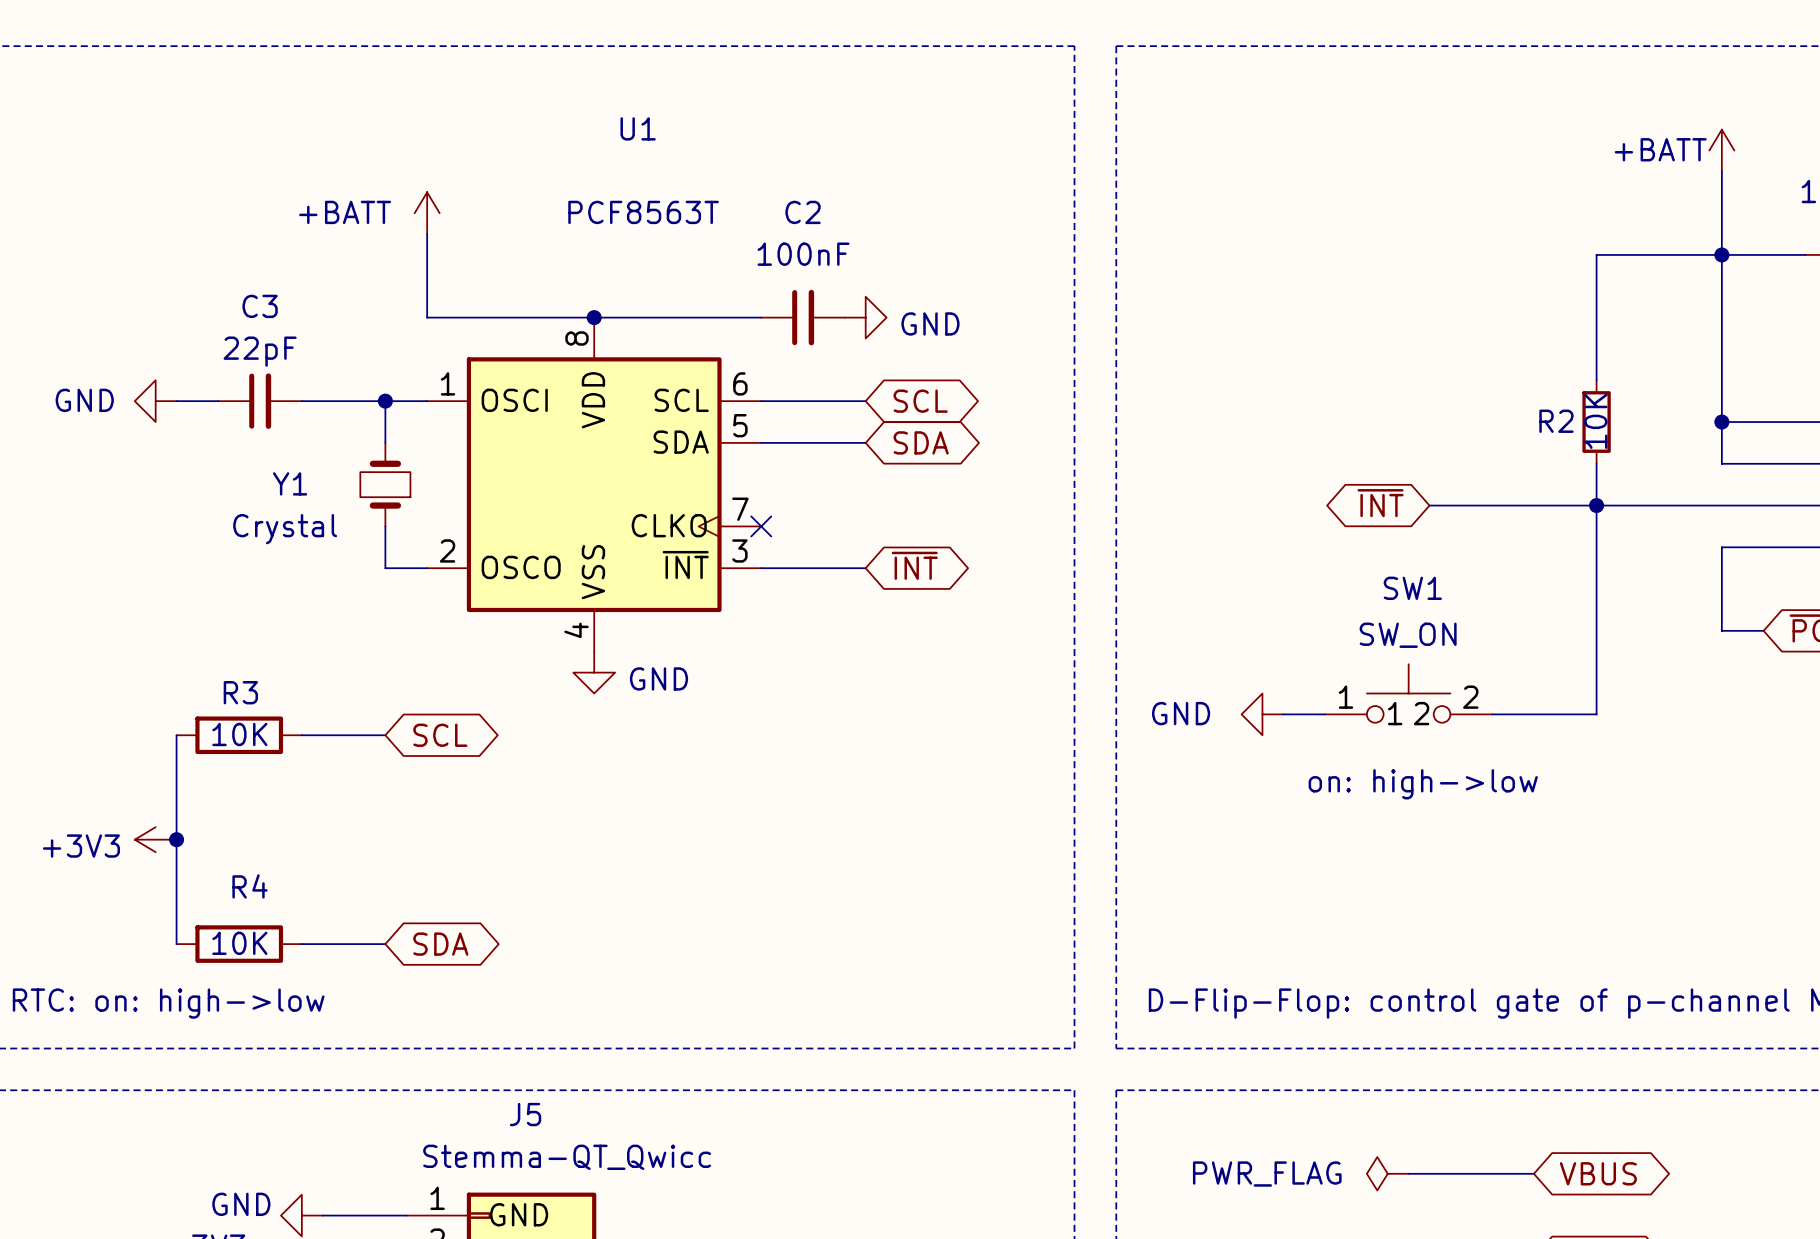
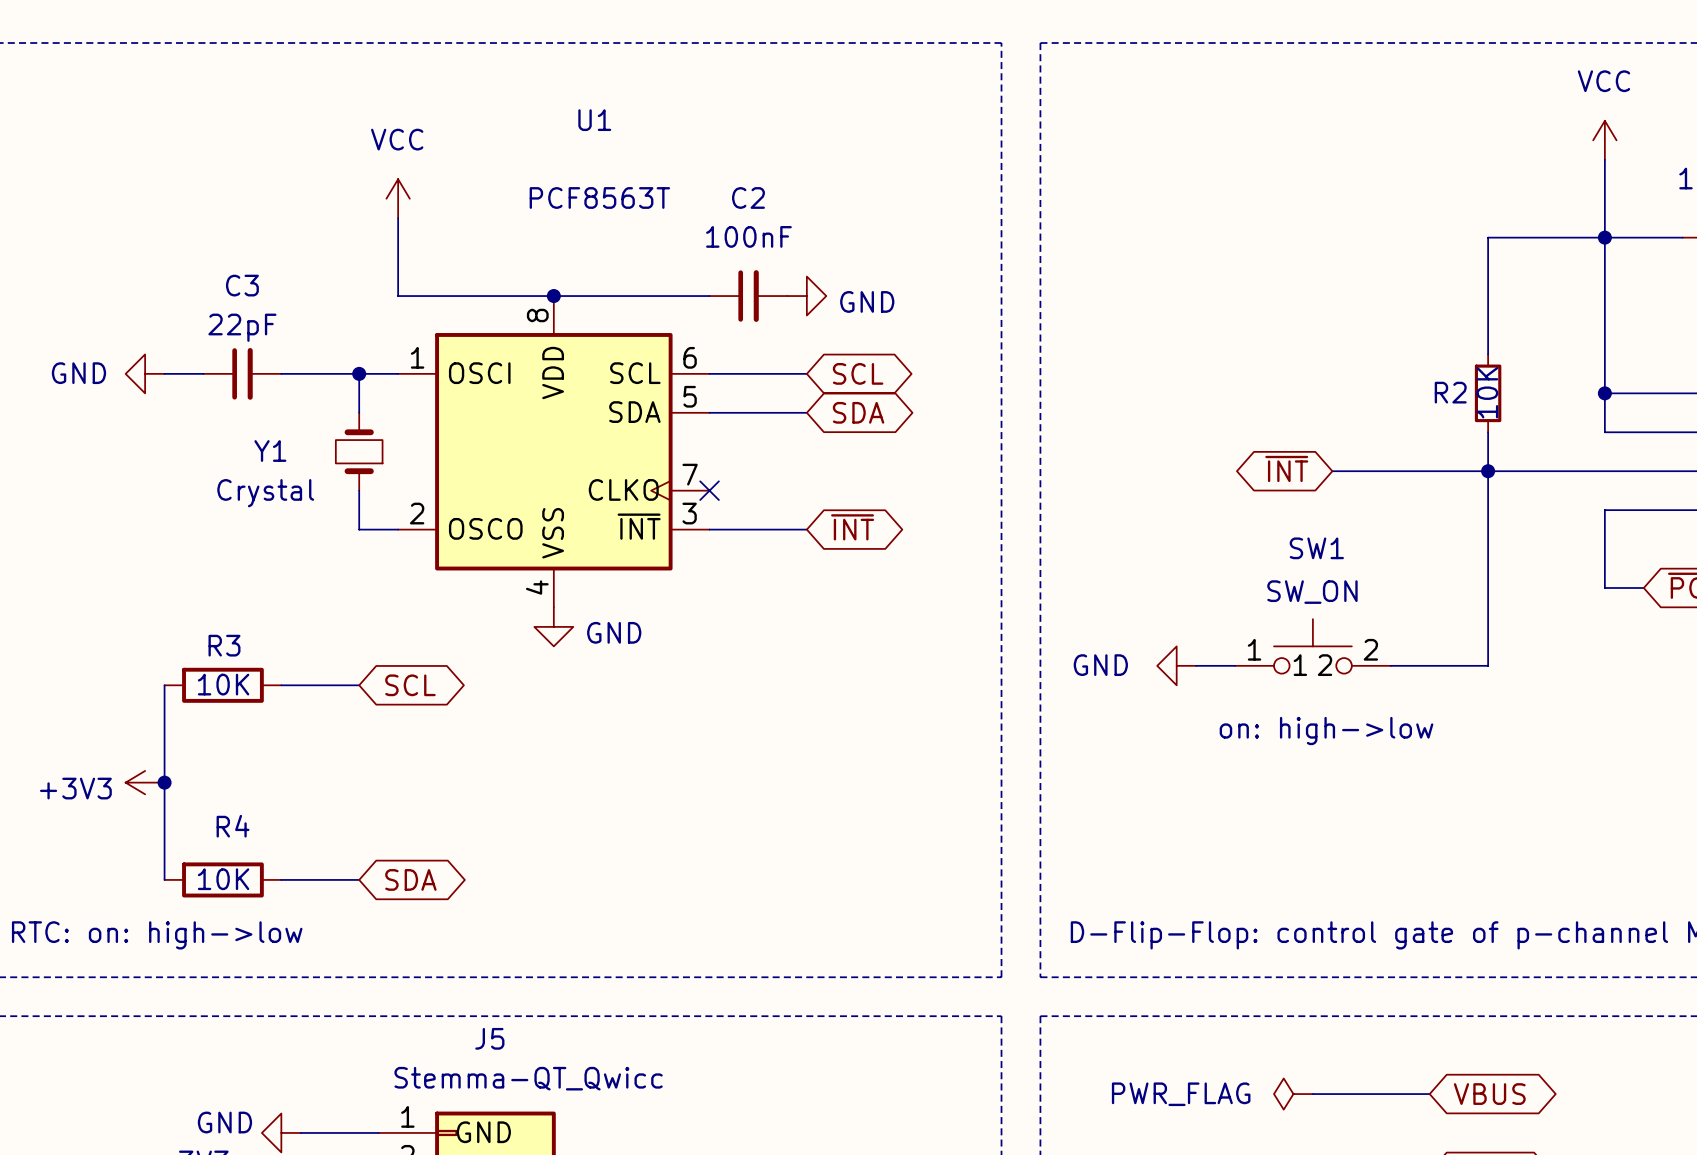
power symbol: +BATT (1721, 150) -> VCC (1604, 140)
power symbol: +BATT (427, 213) -> VCC (398, 198)

